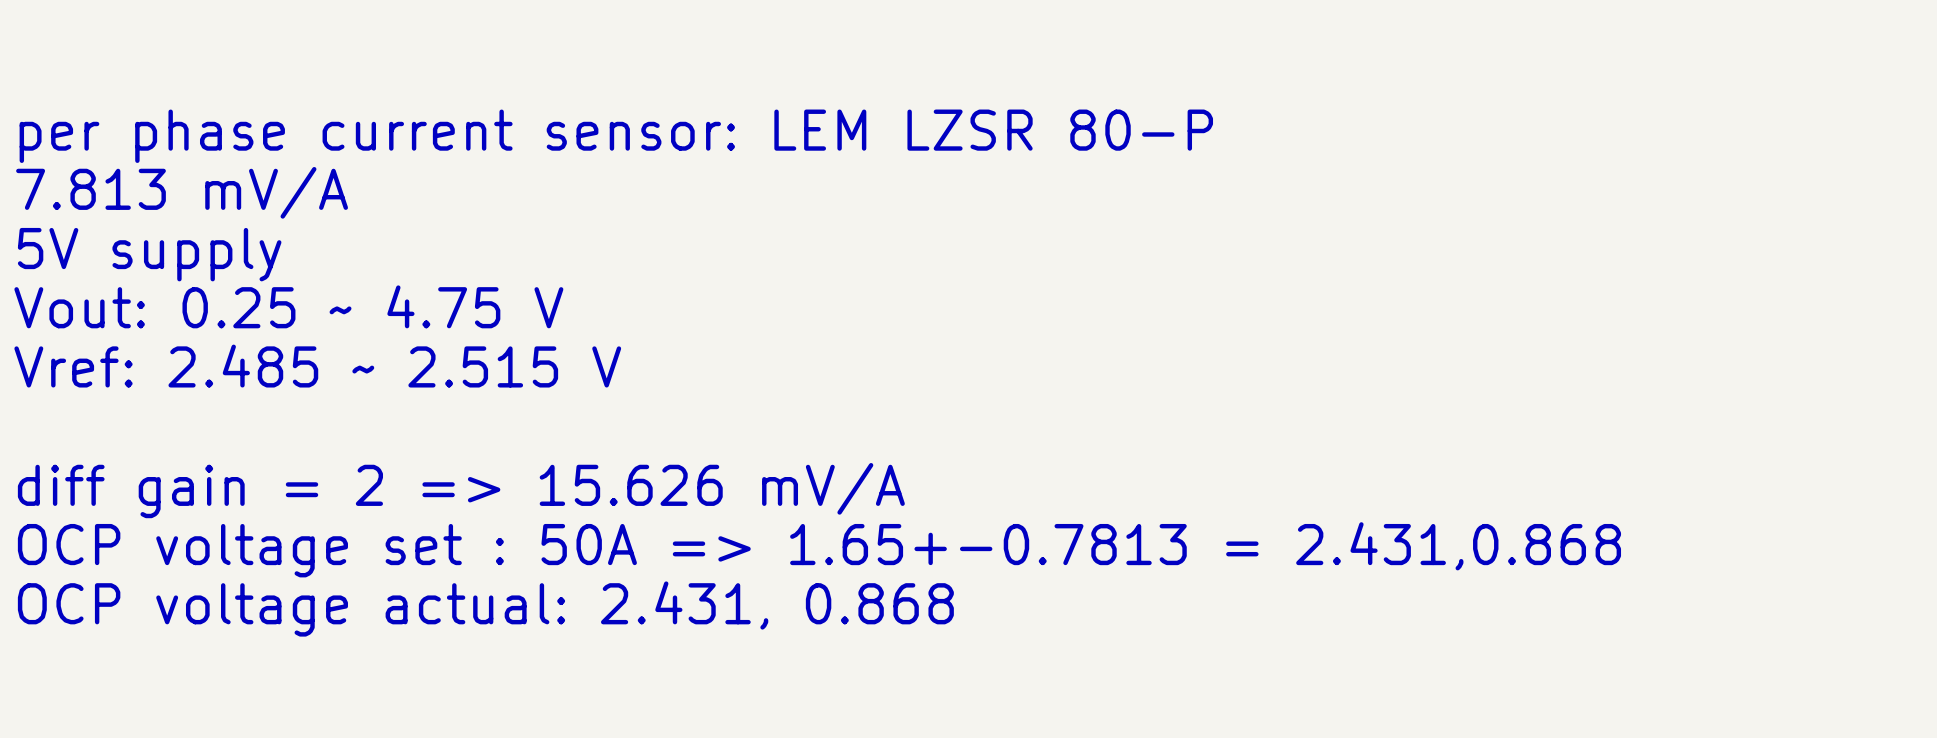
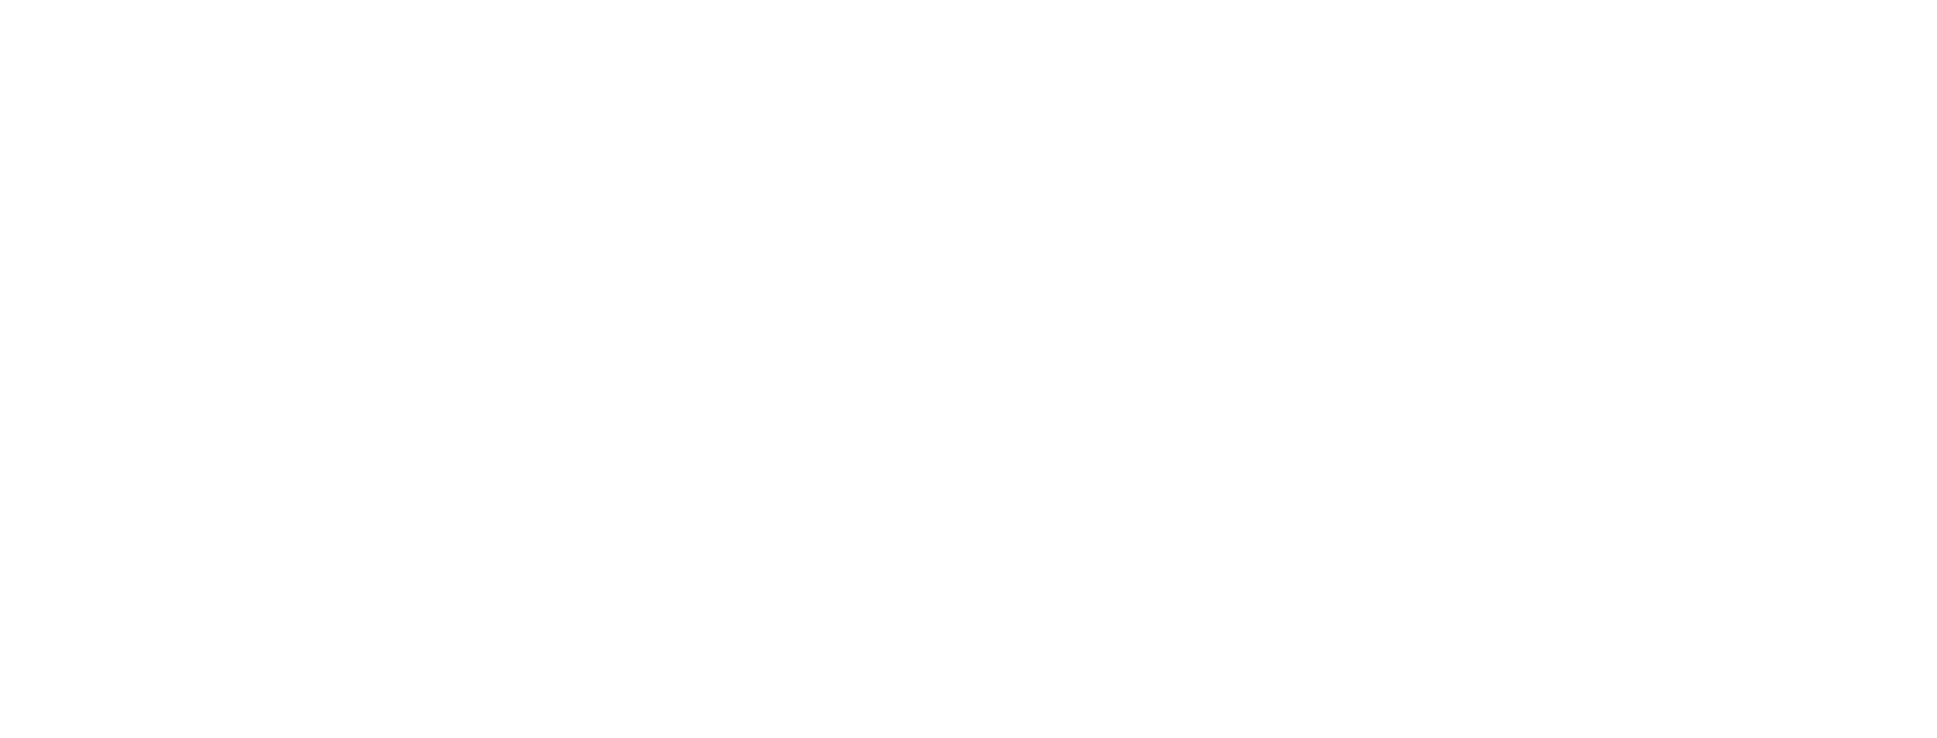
text: per phase current sensor: LEM LZSR 80-P (616, 136) -> none
text: 7.813 mV/A (182, 192) -> none
text: 5V supply (149, 254) -> none
text: Vout: 0.25 ~ 4.75 V (288, 306) -> none
text: Vref: 2.485 ~ 2.515 V (317, 366) -> none
text: diff gain = 2 => 15.626 mV/A (461, 490) -> none
text: OCP voltage set : 50A => 1.65+-0.7813 = 2.431,0.868 (819, 549) -> none
text: OCP voltage actual: 2.431, 0.868 (485, 609) -> none

